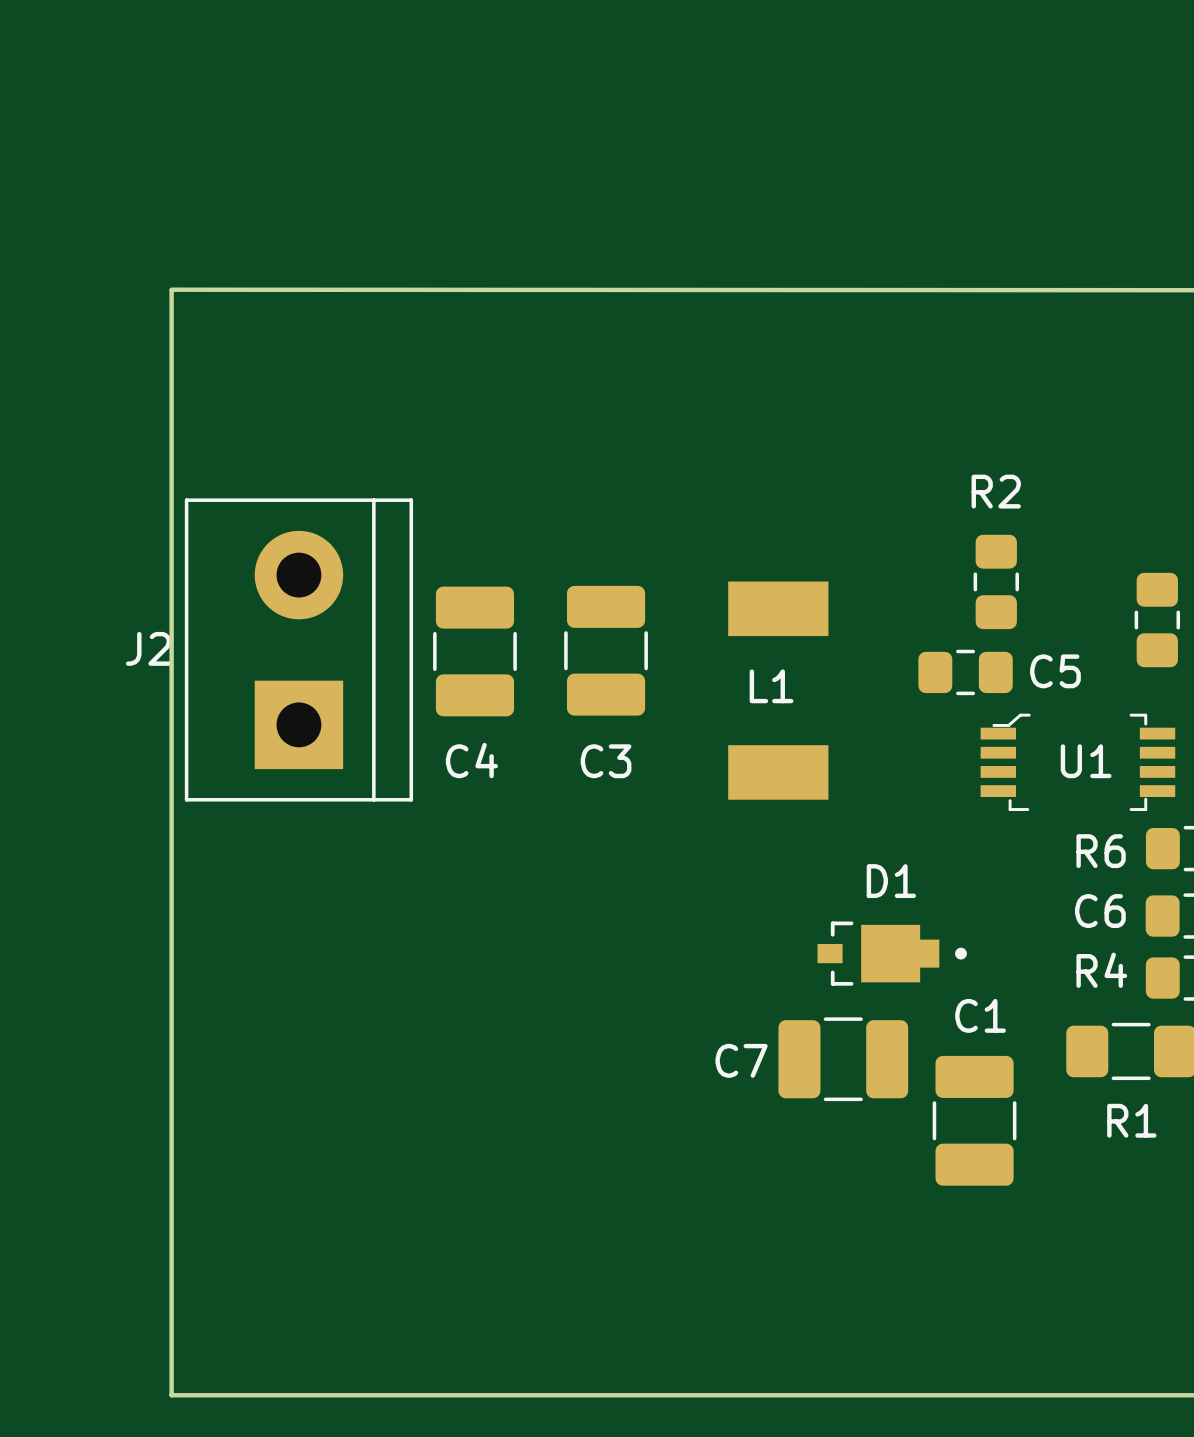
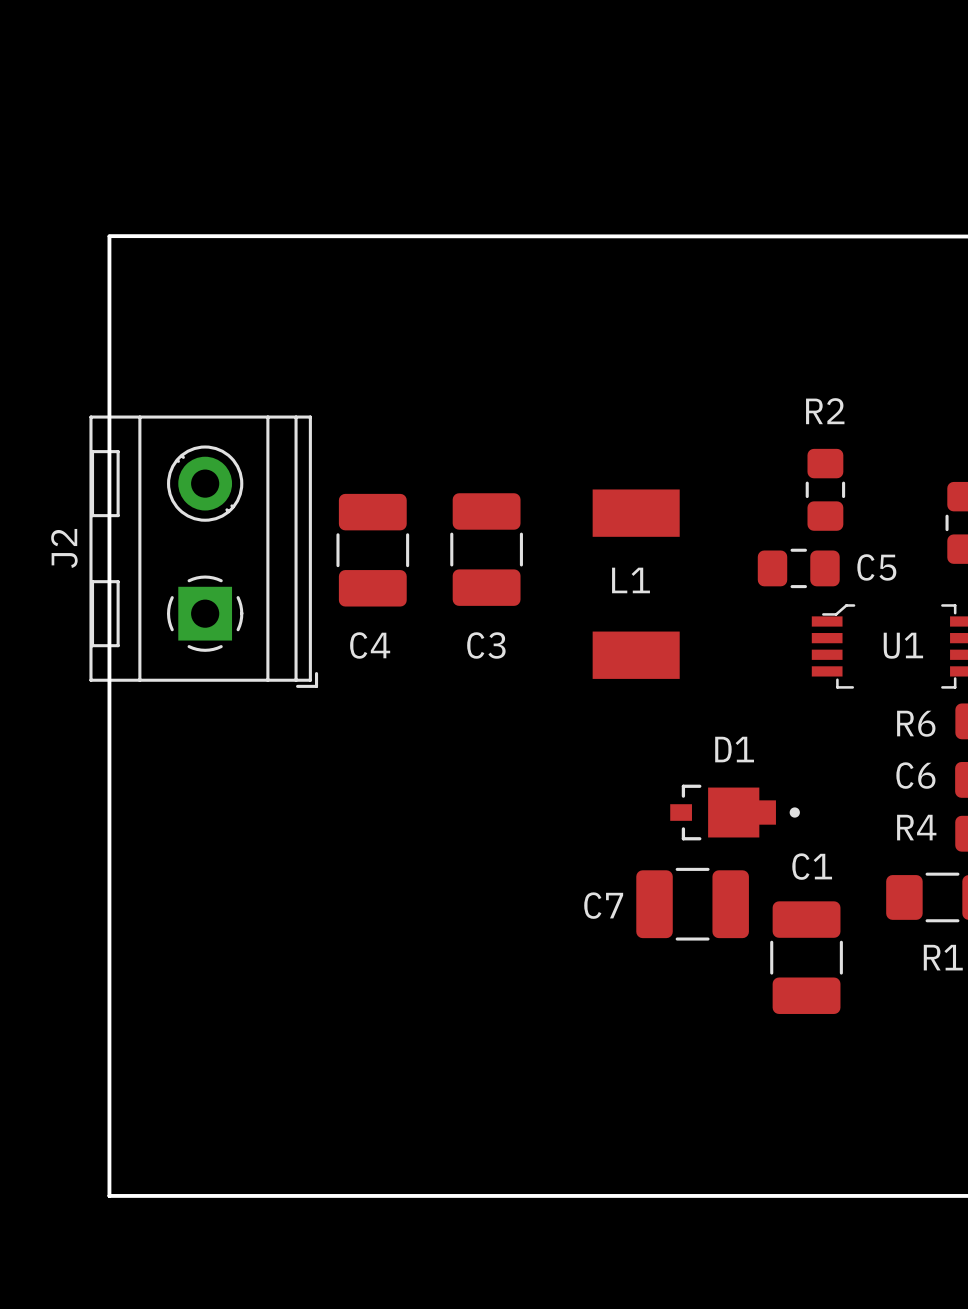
J2 footprint: [184, 498, 414, 802] -> [89, 415, 319, 688]

